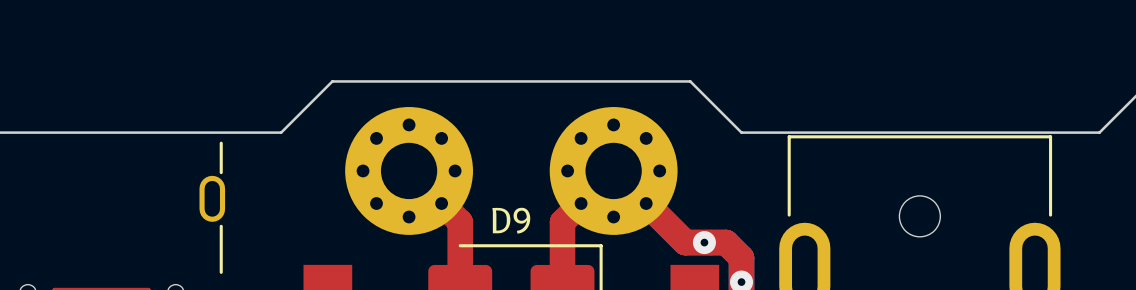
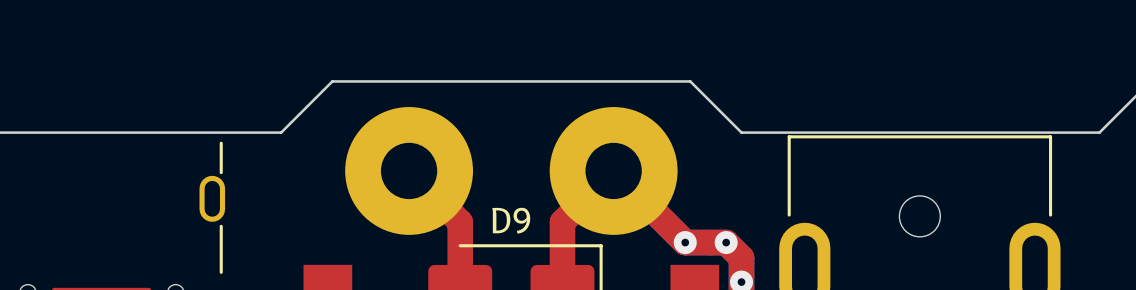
part footprint: [345, 107, 474, 235] -> [345, 107, 474, 235]
part footprint: [549, 107, 678, 235] -> [549, 107, 678, 235]
via: none -> (685, 242)
via: (704, 242) -> none
via: none -> (726, 242)

